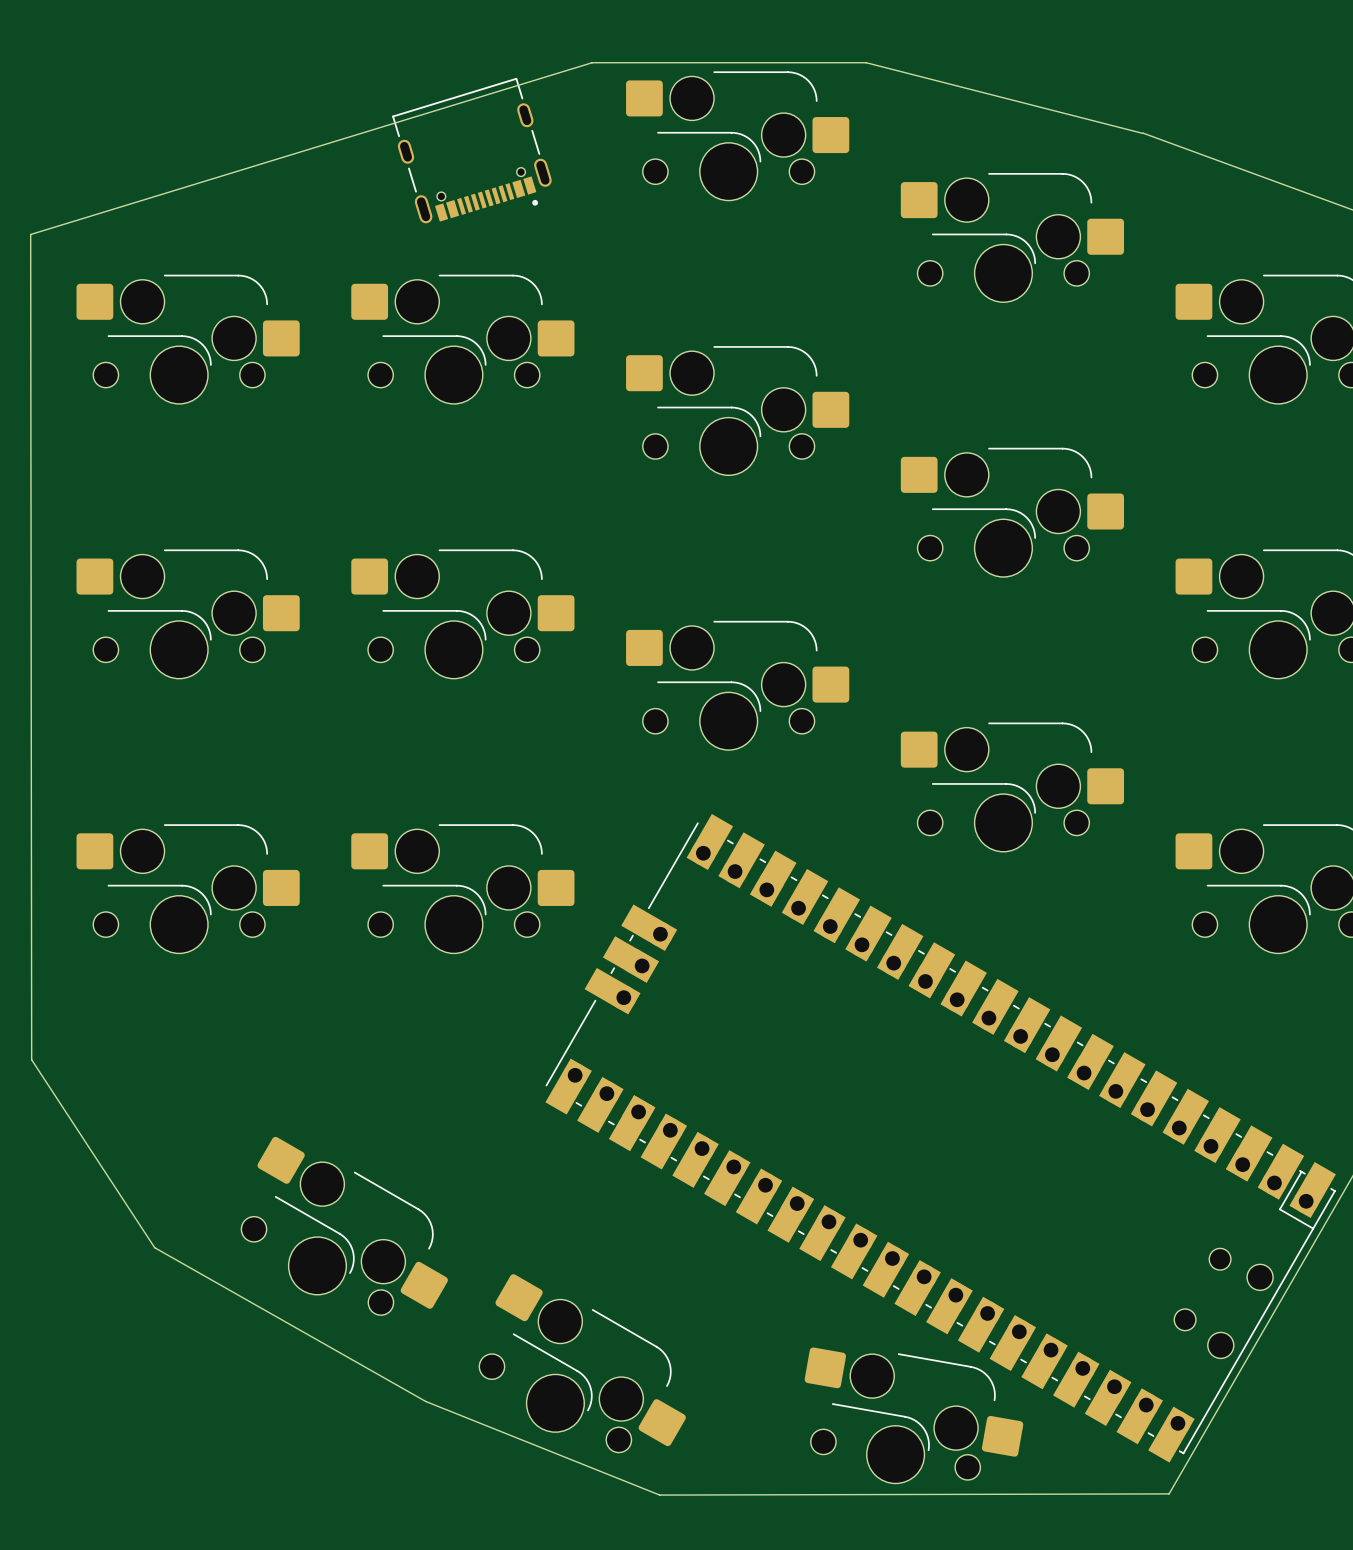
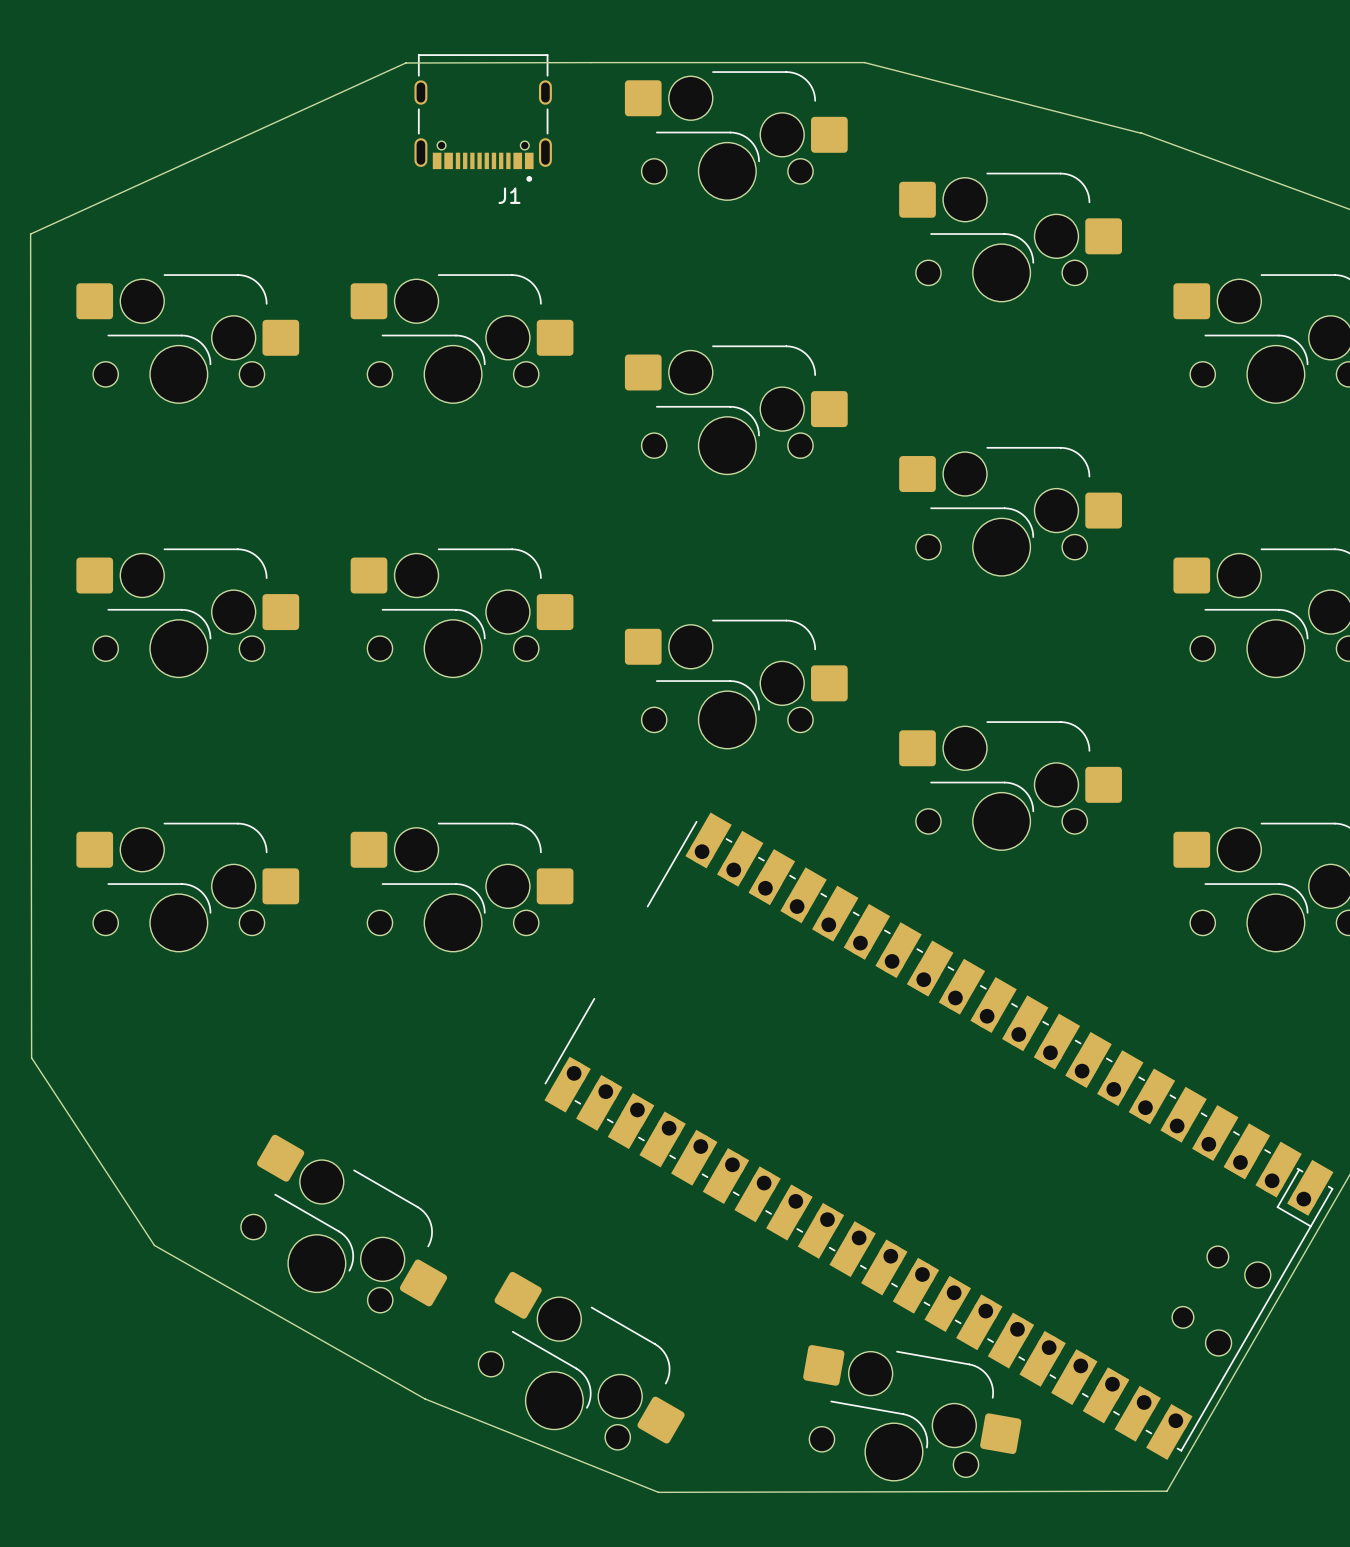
board edge: (592, 62) (30, 234) -> (591, 62) (405, 63) (30, 234)
J1: none -> (483, 117)
part: (471, 150) -> none
part footprint: [545, 814, 1336, 1463] -> [544, 812, 1334, 1460]

